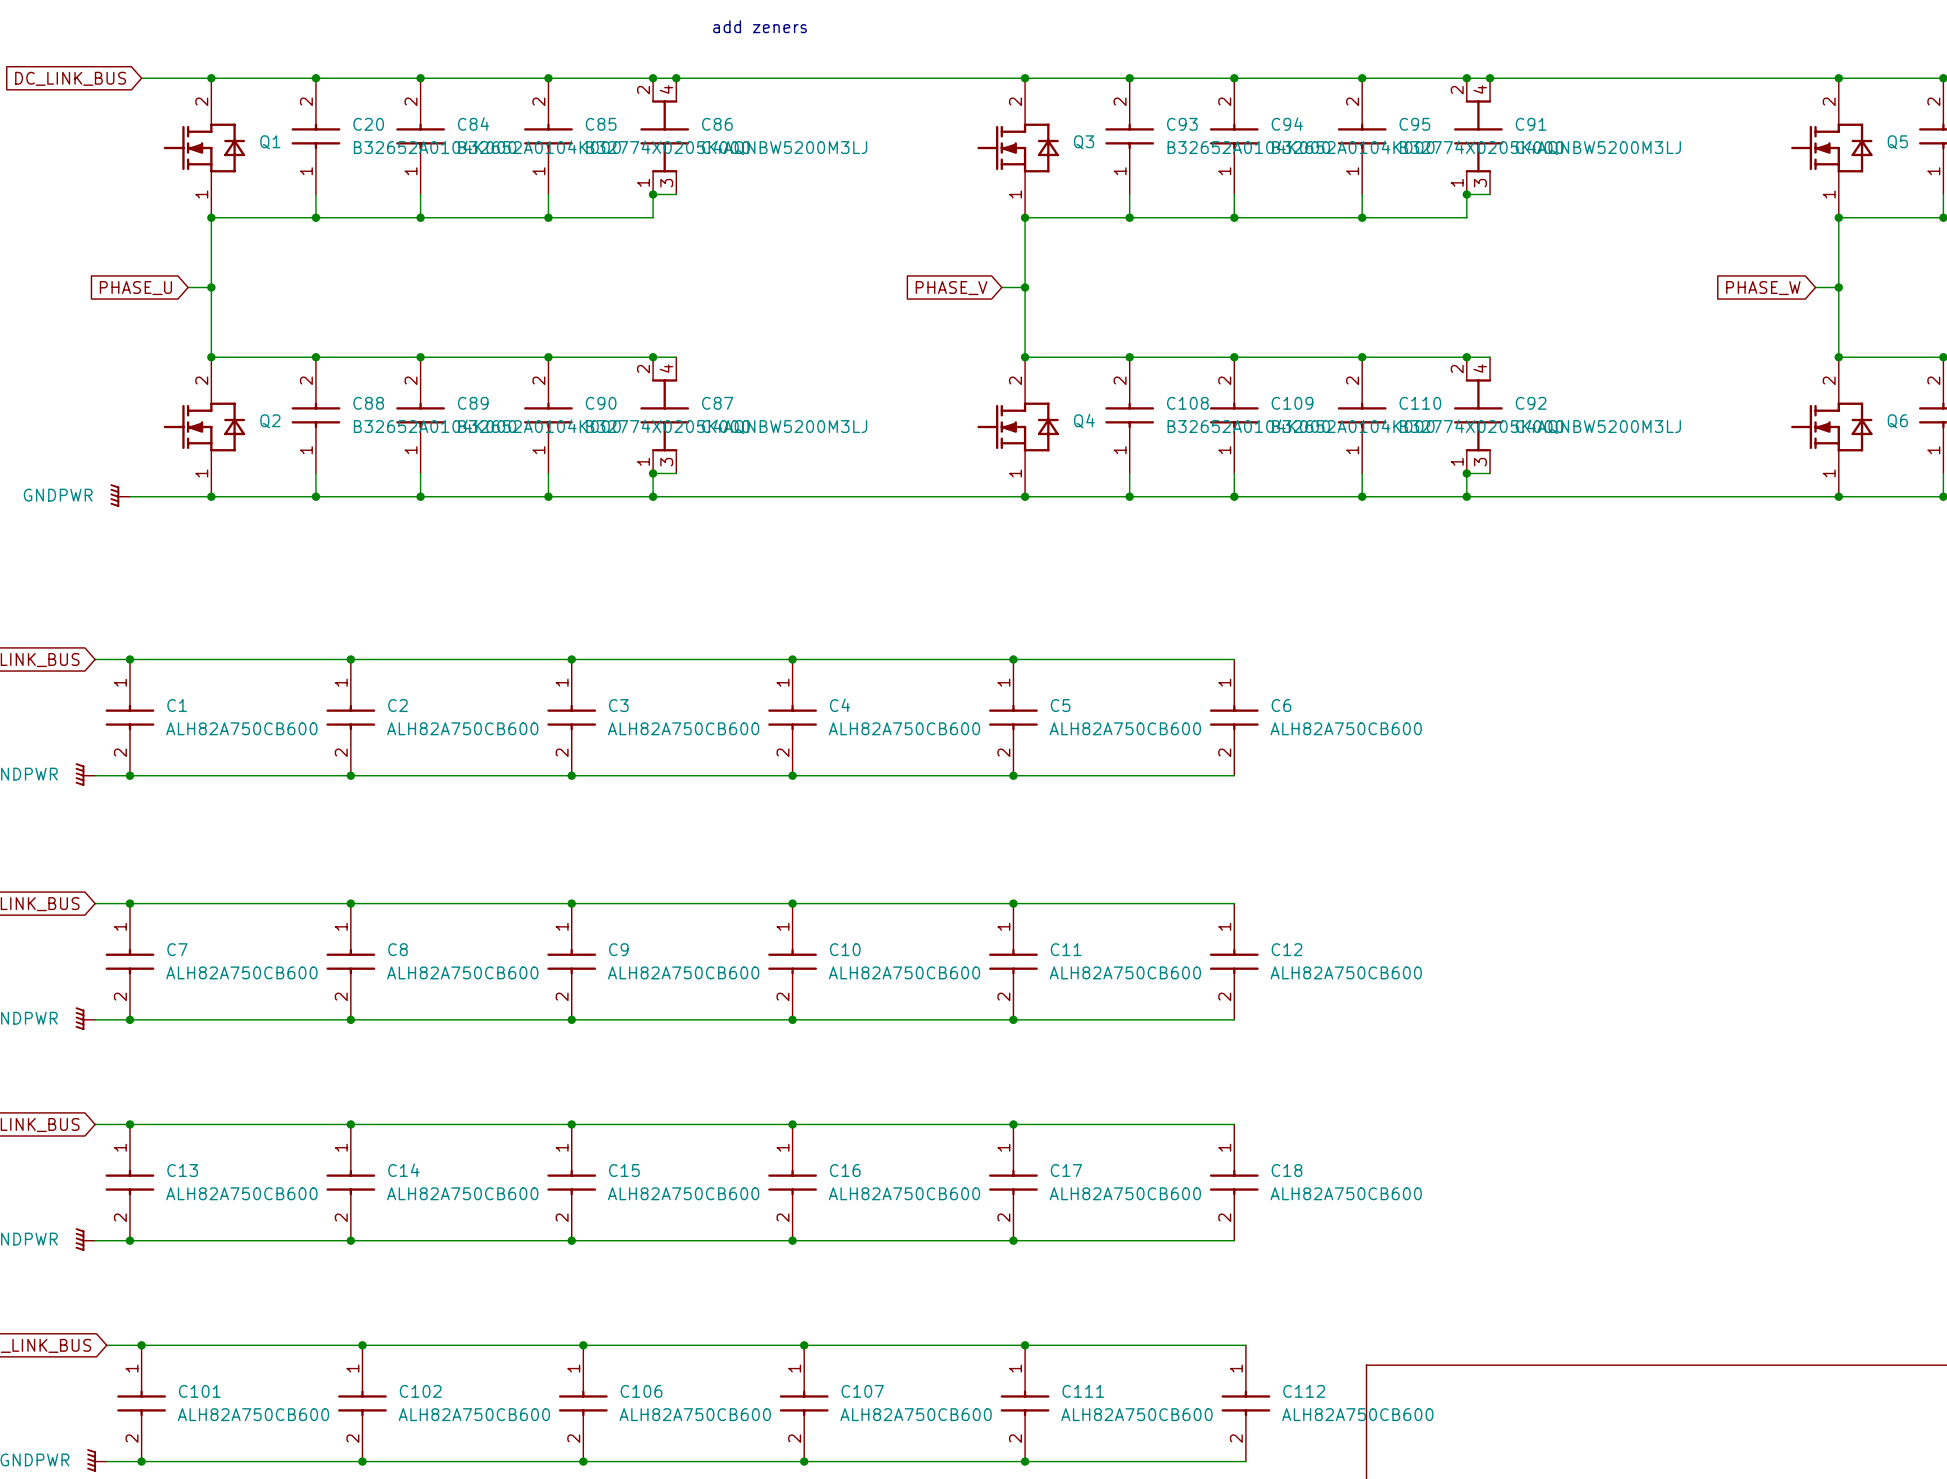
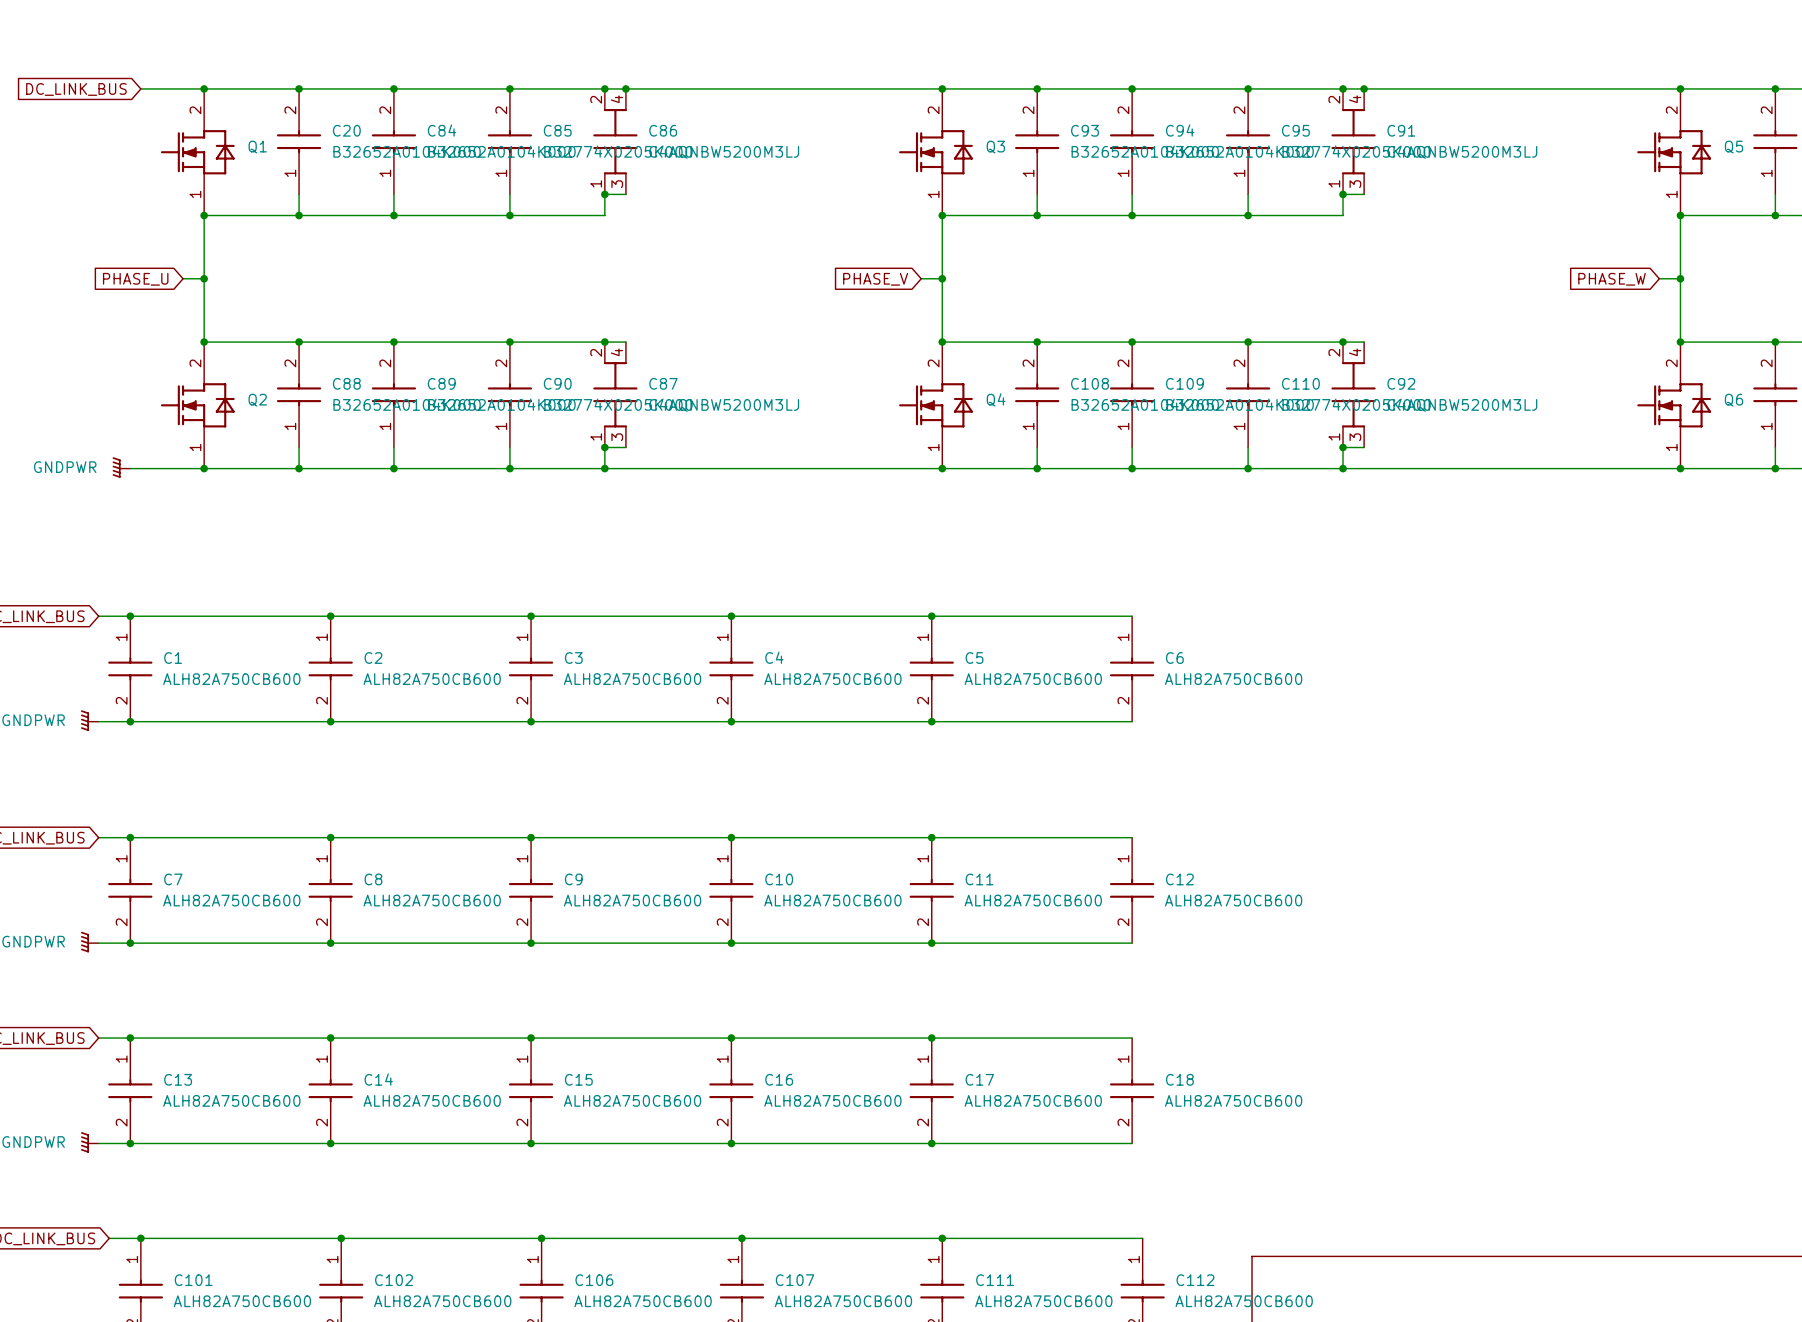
text: add zeners (760, 26) -> none

